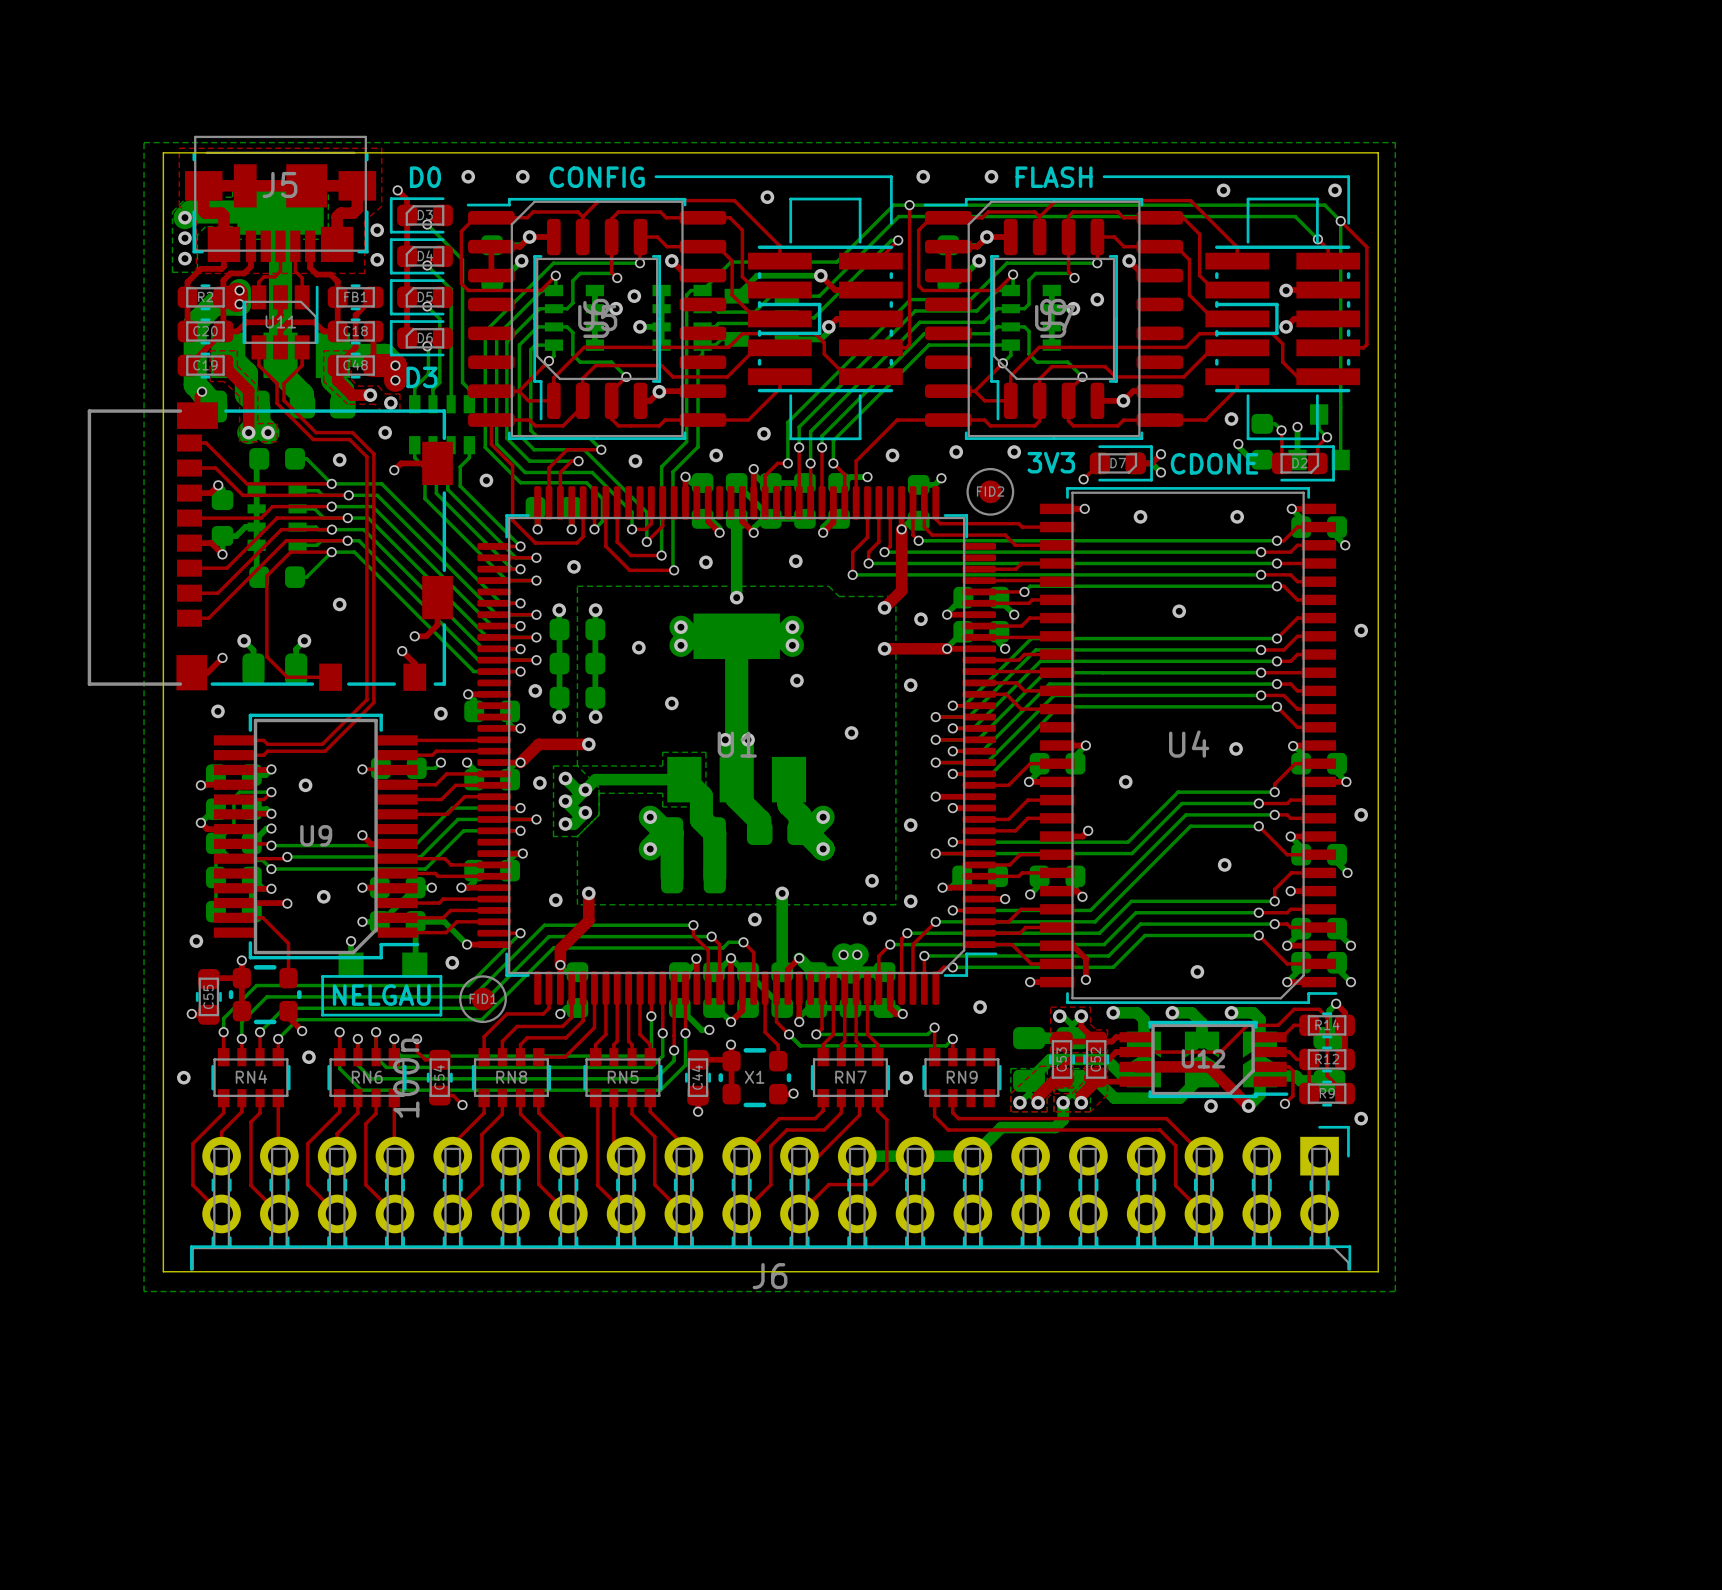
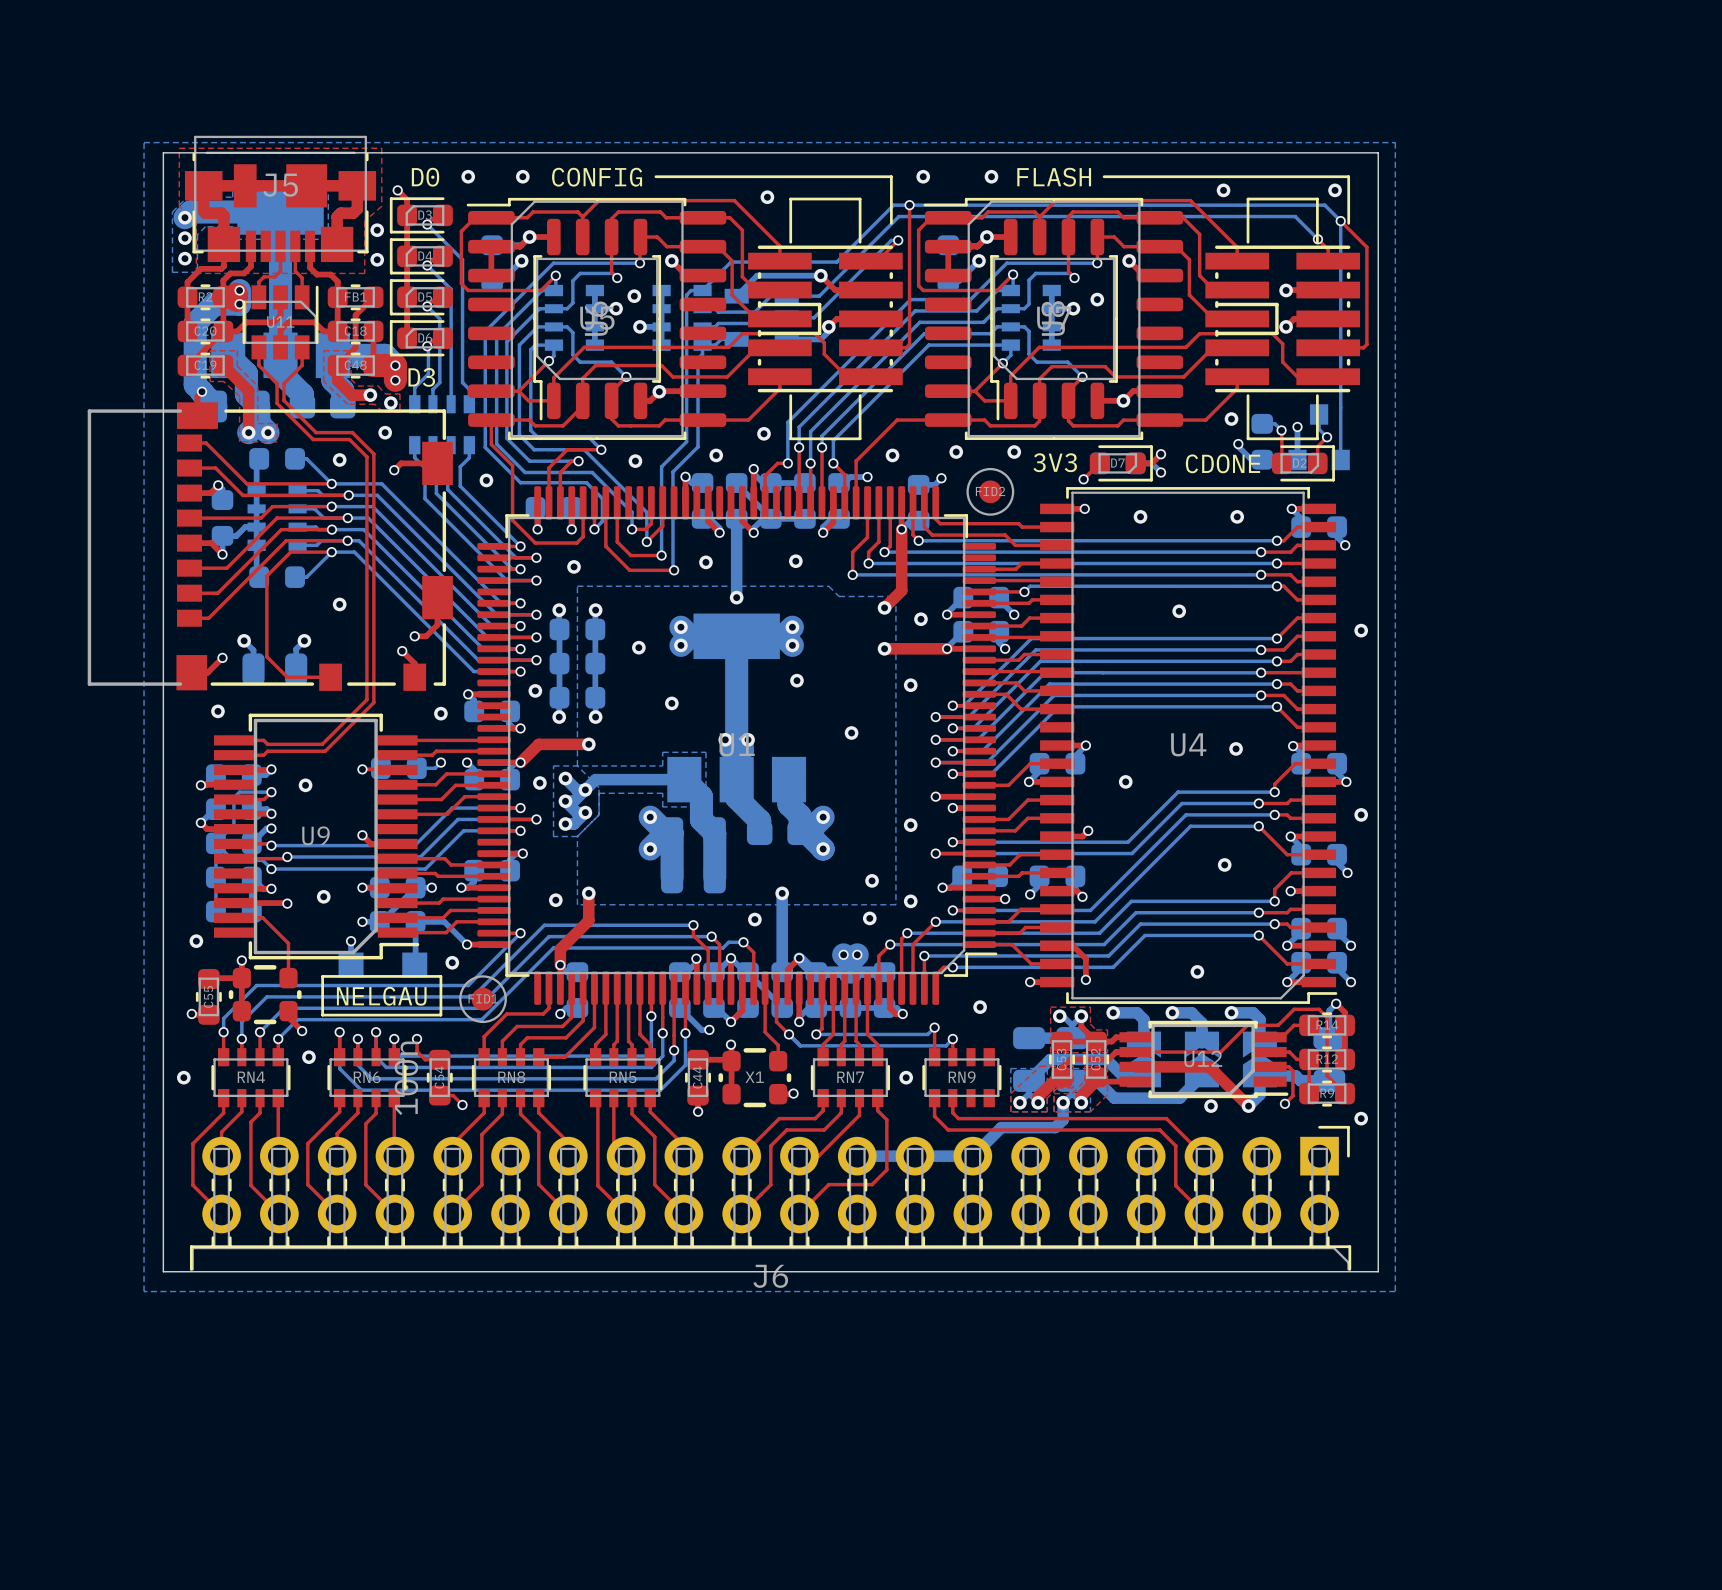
drawing: [321, 975, 443, 1017] -> none
text: none -> NELGAU (381, 996)

